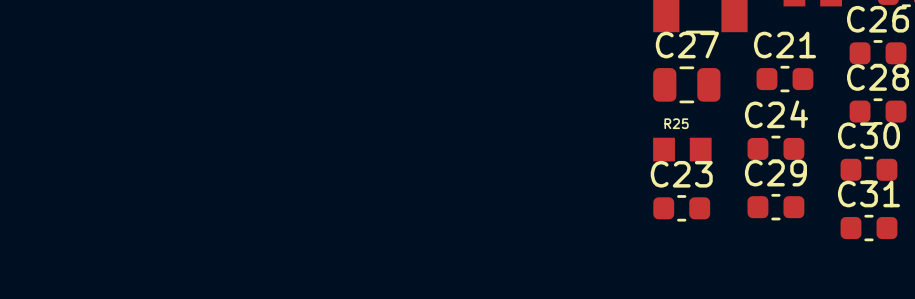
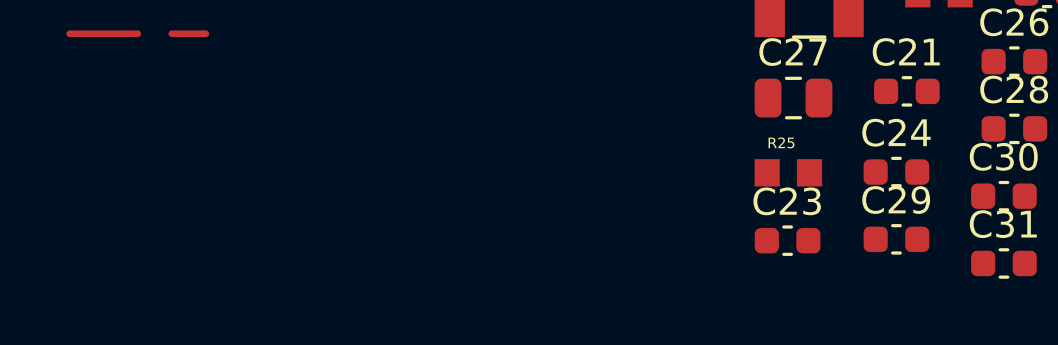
track: none -> (69, 33) (137, 33)
track: none -> (171, 33) (205, 33)

